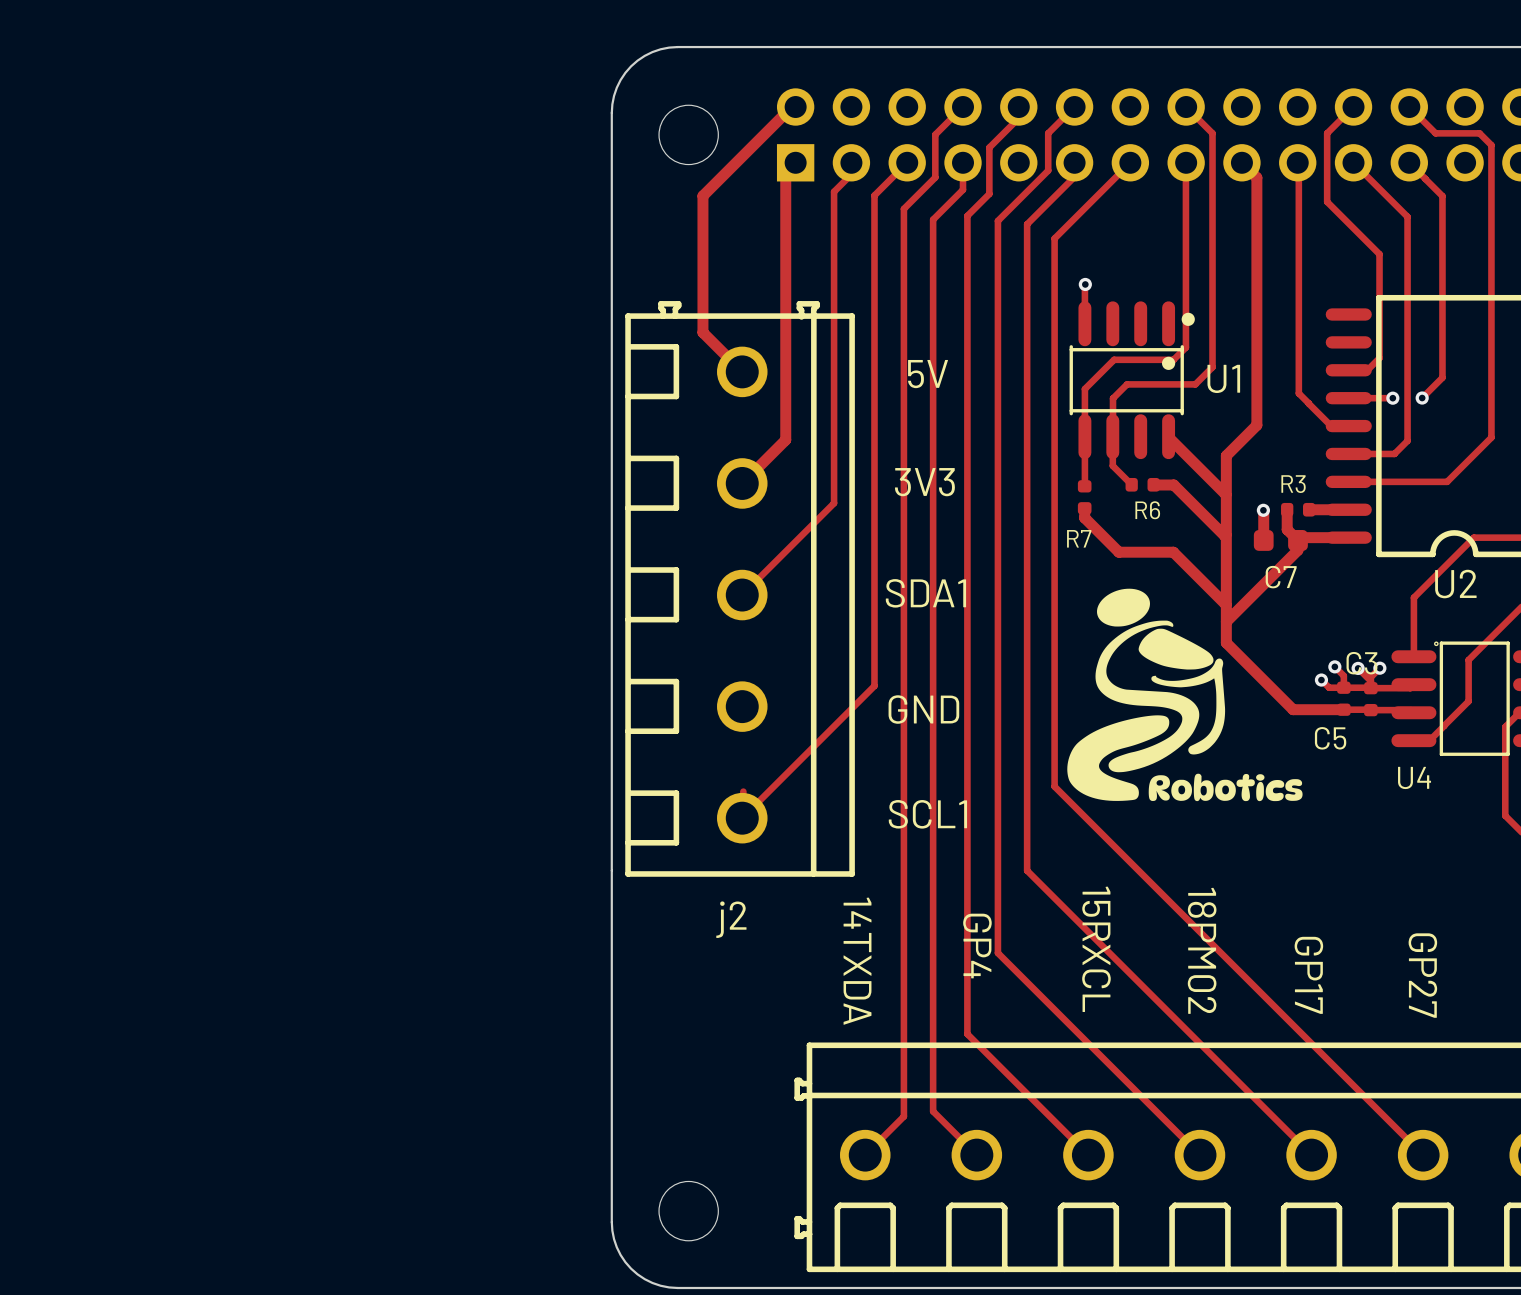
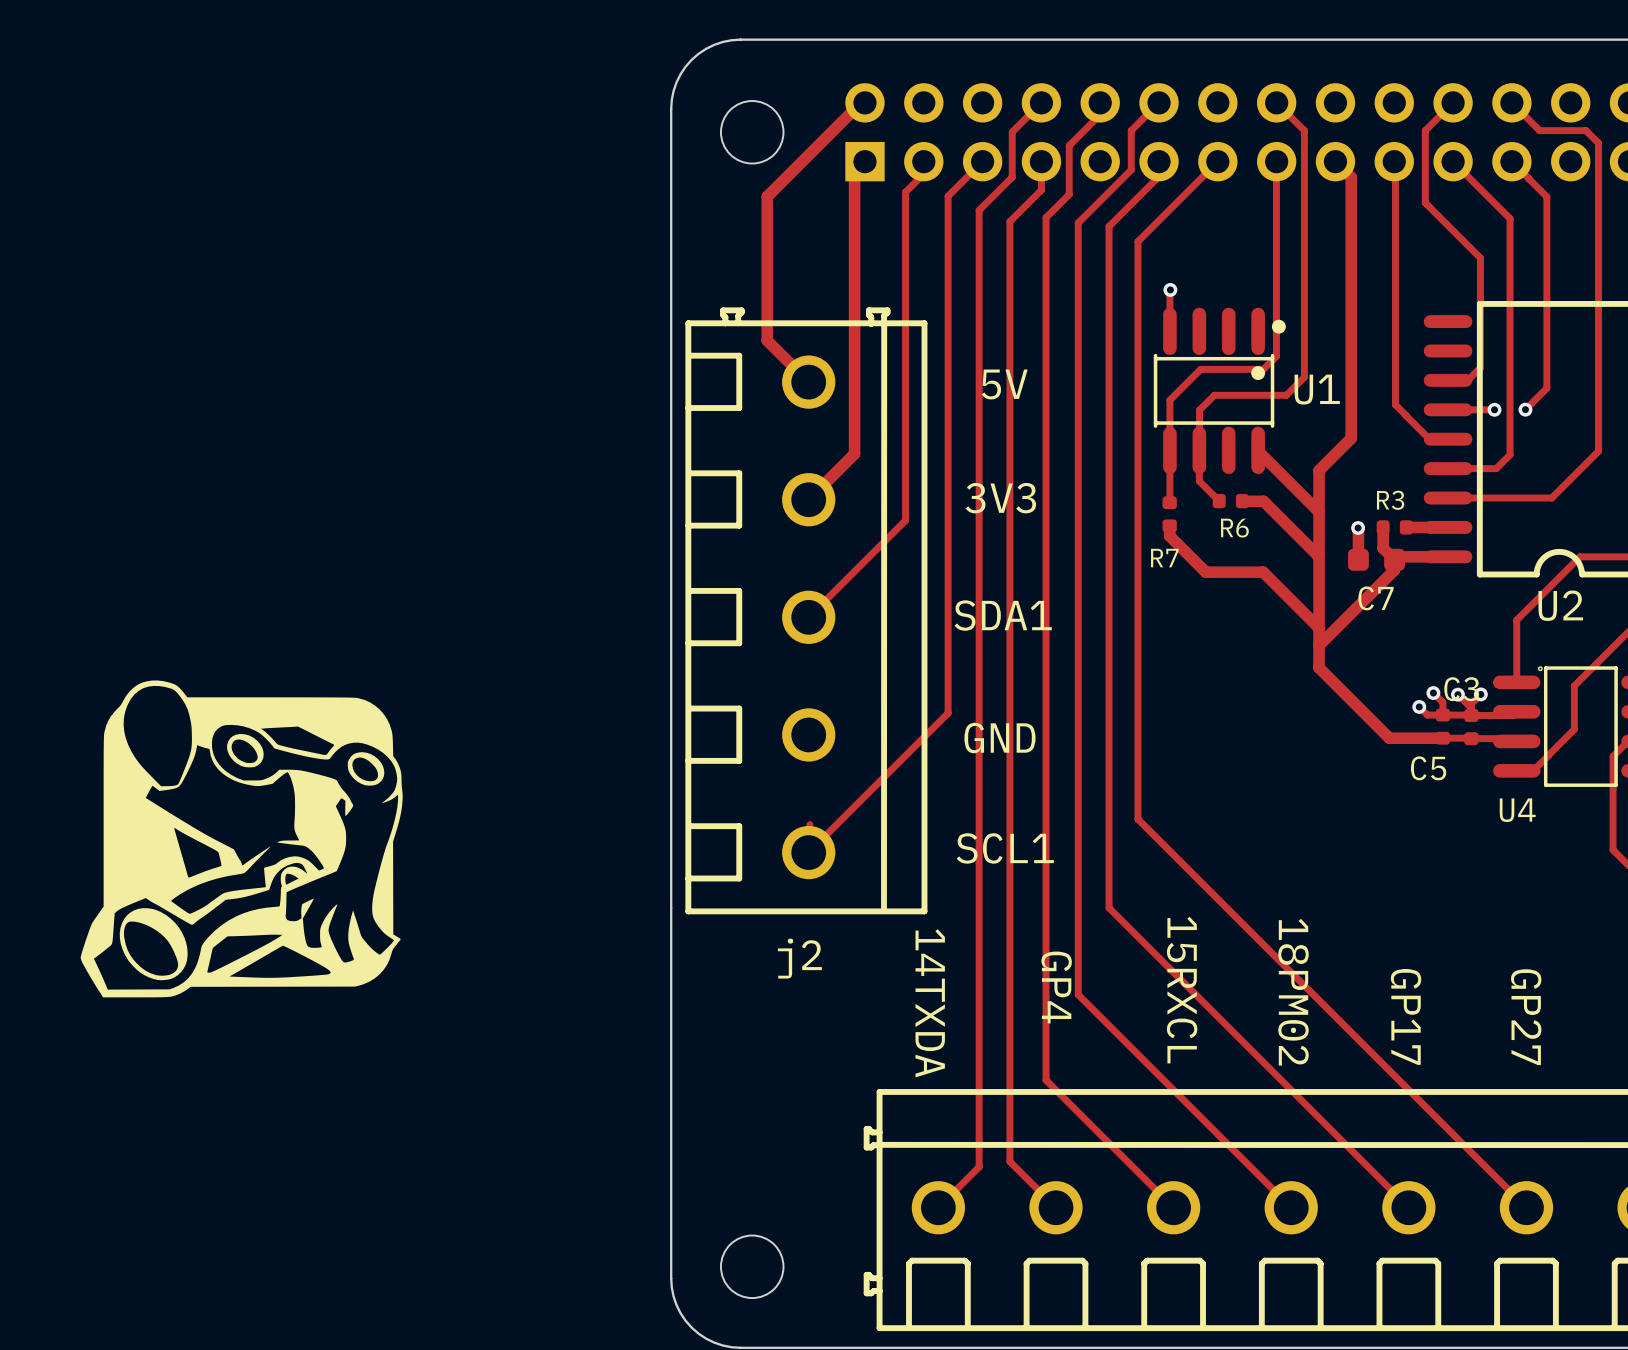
drawing: [1067, 588, 1303, 802] -> none
drawing: none -> [80, 680, 403, 998]

